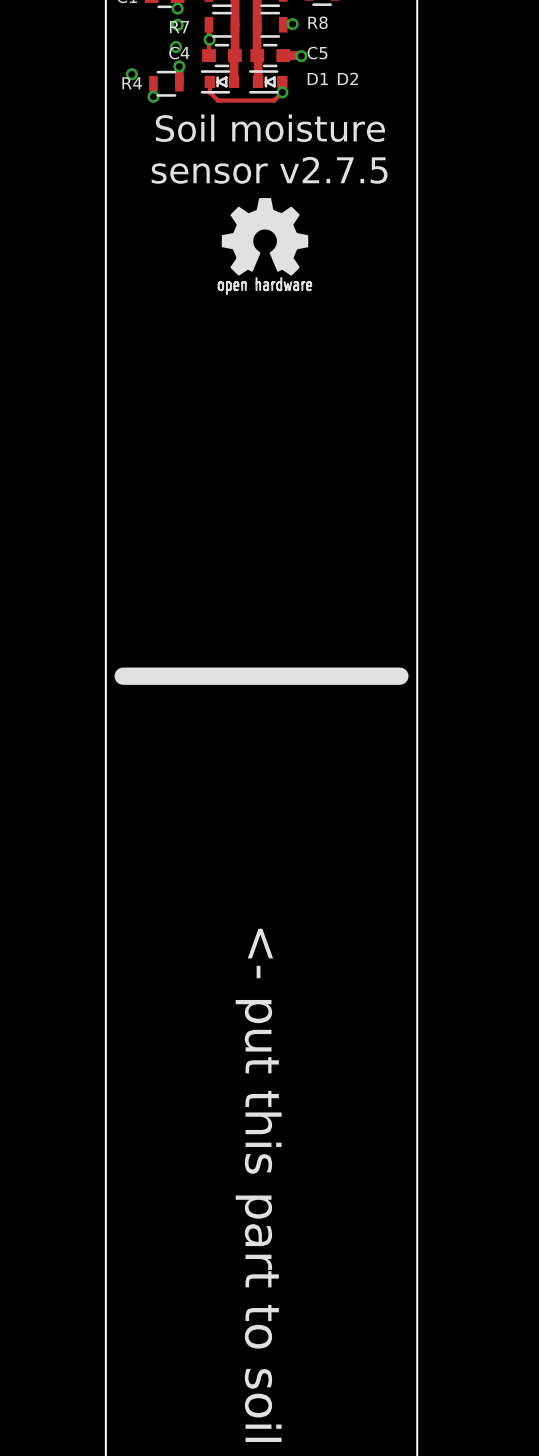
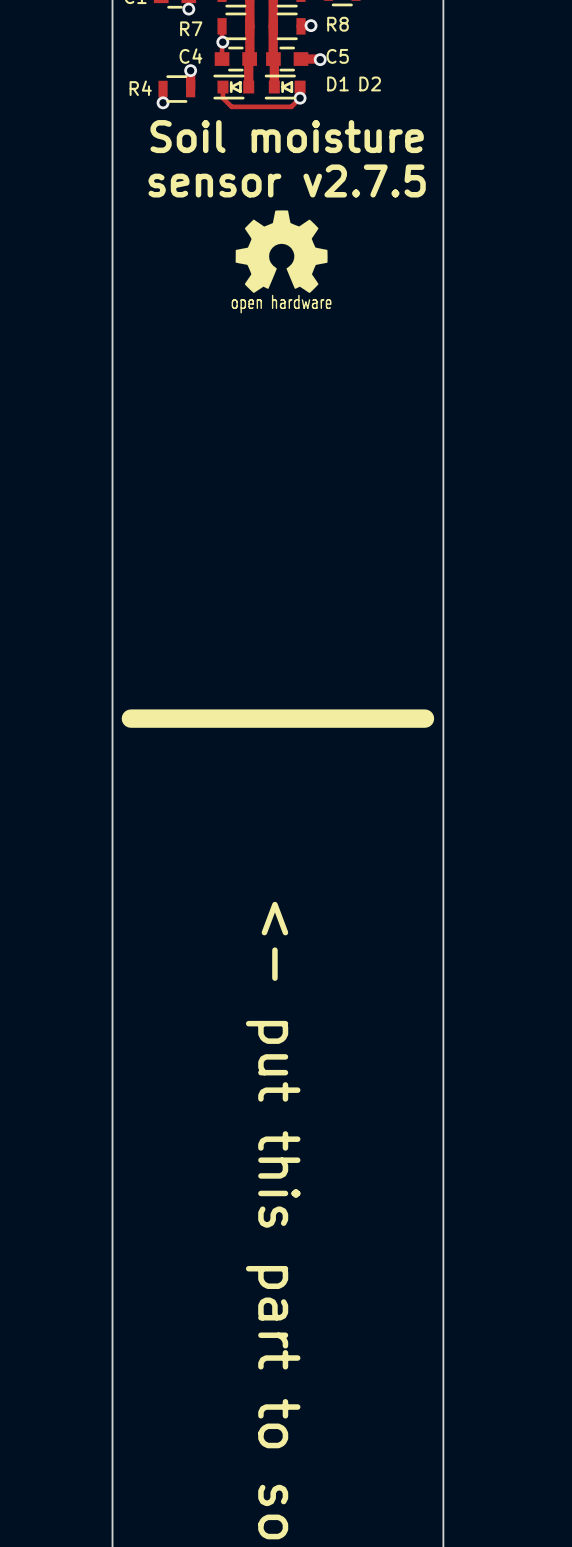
via: (177, 24) -> none
via: (175, 47) -> none
via: (131, 74) -> none

